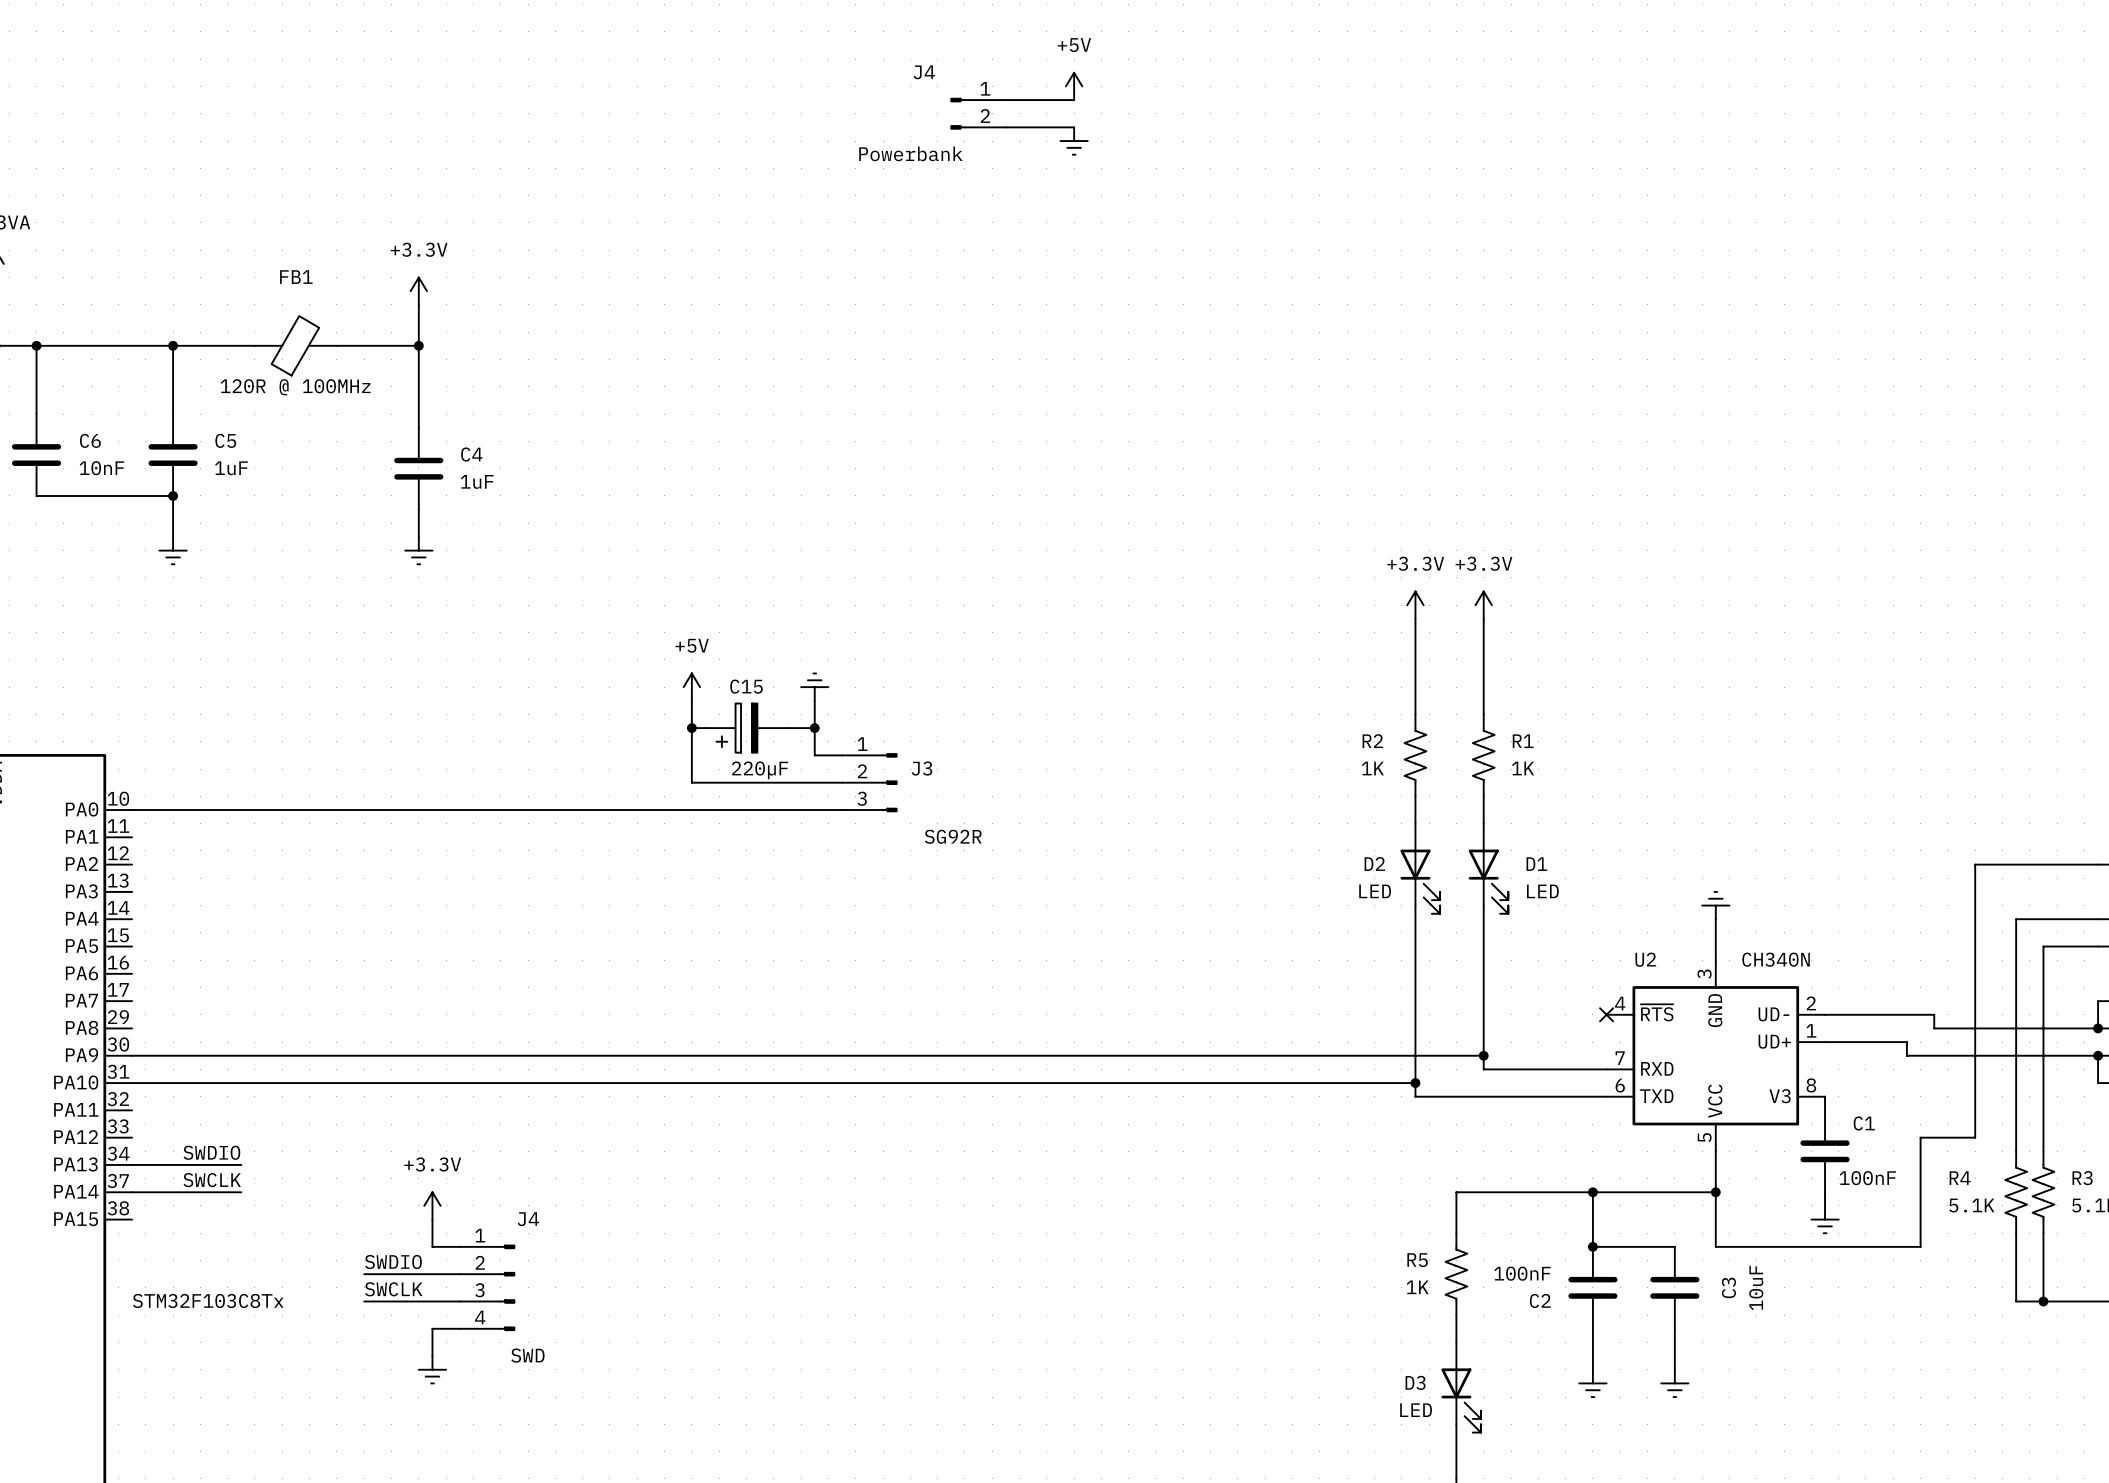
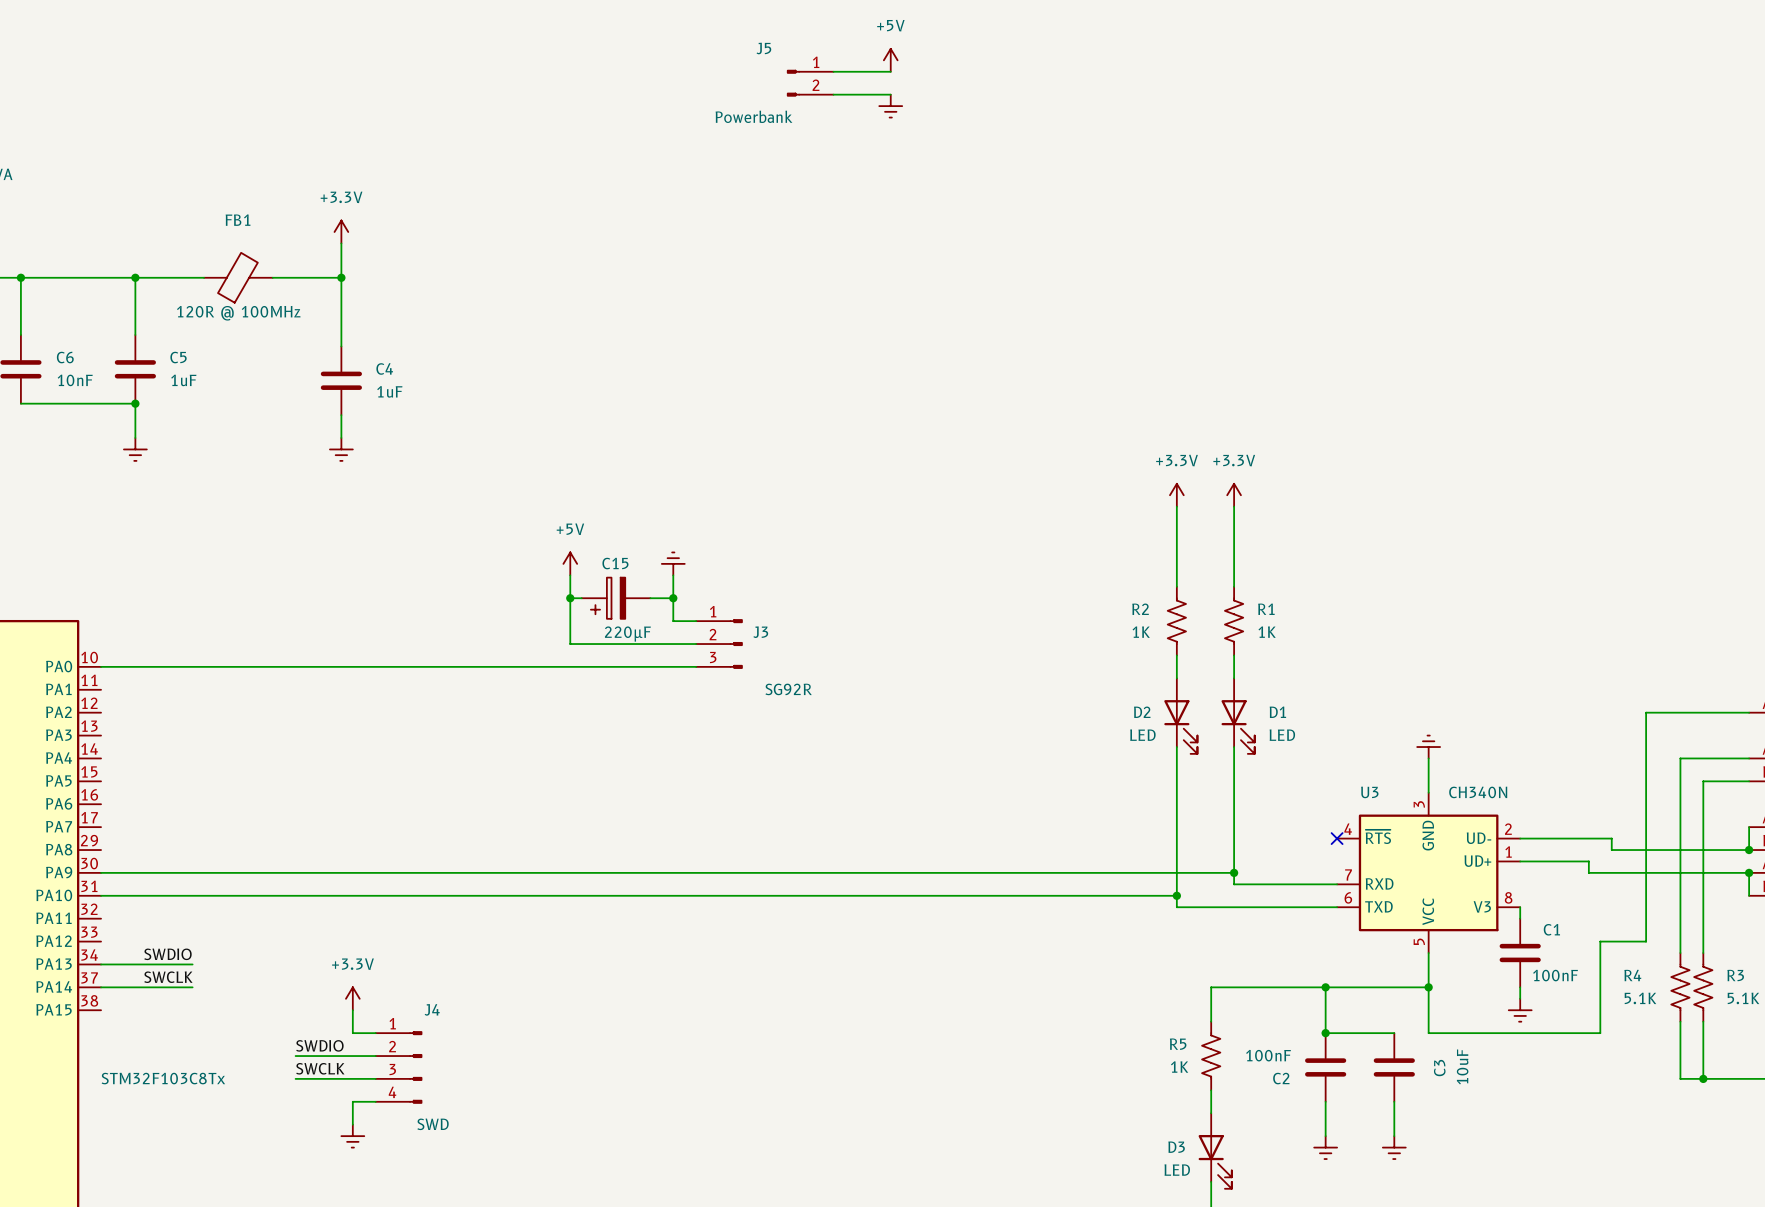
J4 name: J4 (924, 72) -> J5 (763, 48)
U2 name: U2 (1645, 959) -> U3 (1369, 792)

